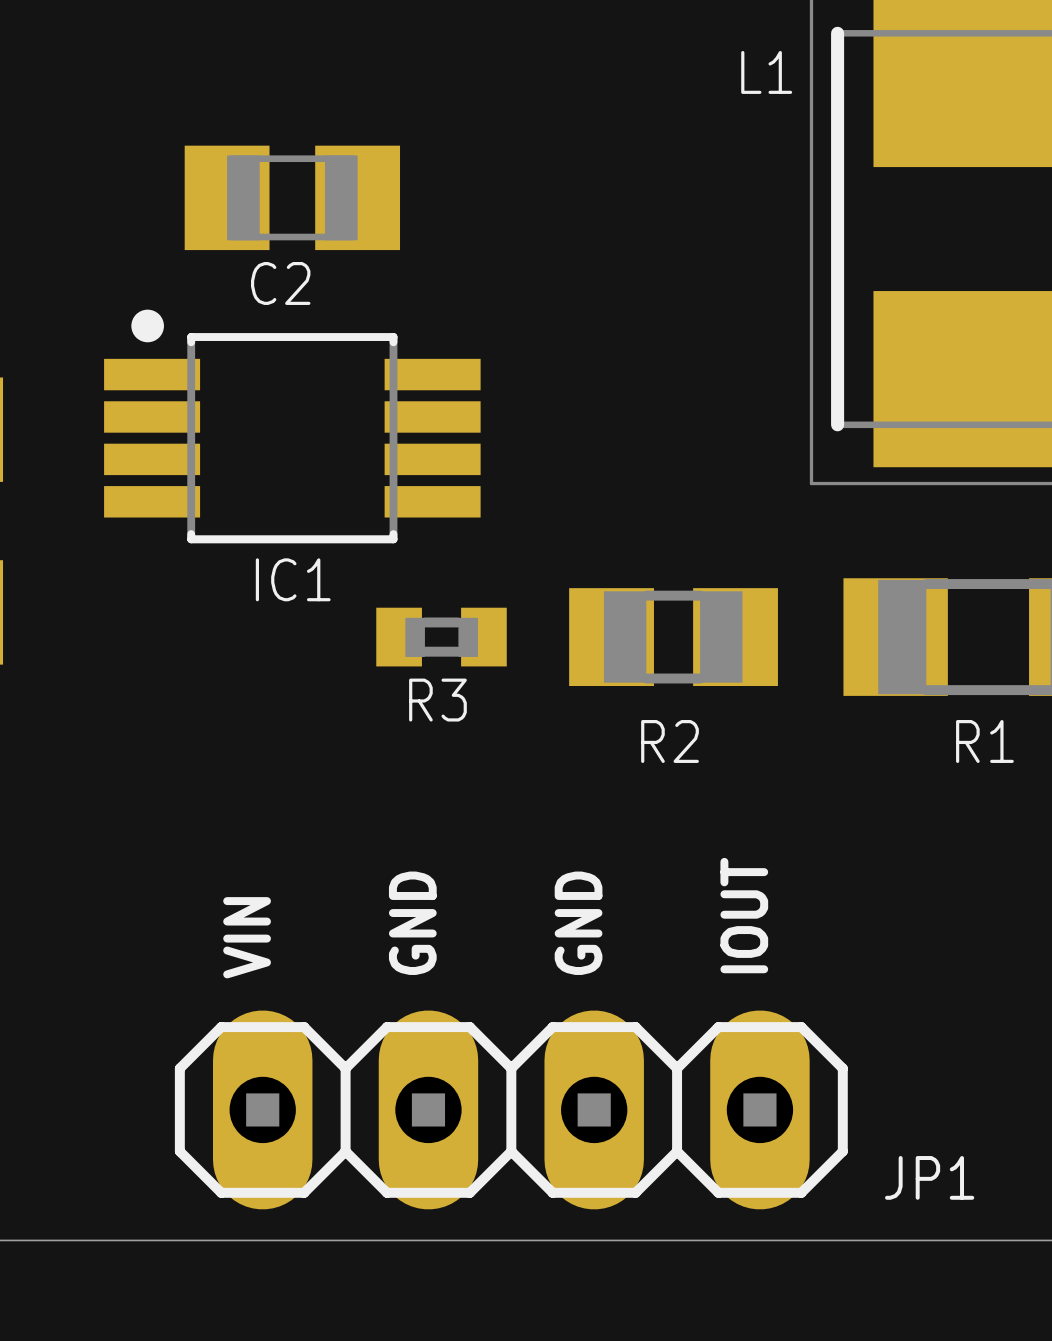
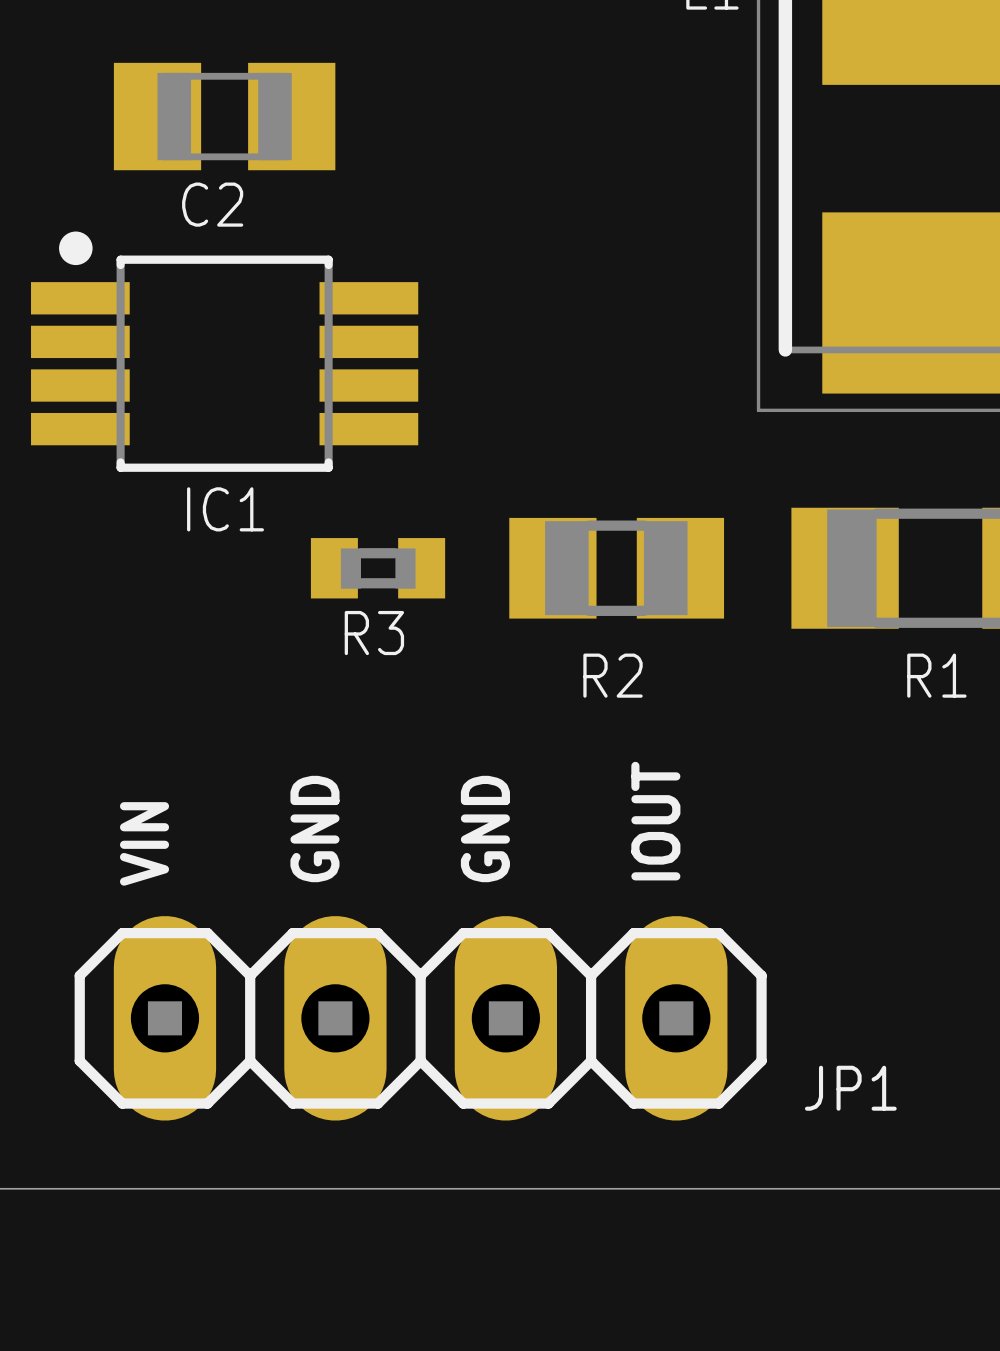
text position: IOUT (744, 915) -> IOUT (655, 821)
text position: GND (412, 923) -> GND (314, 829)
text position: GND (578, 923) -> GND (485, 829)
text position: VIN (247, 937) -> VIN (144, 843)
JP1 position: (511, 1109) -> (420, 1018)

